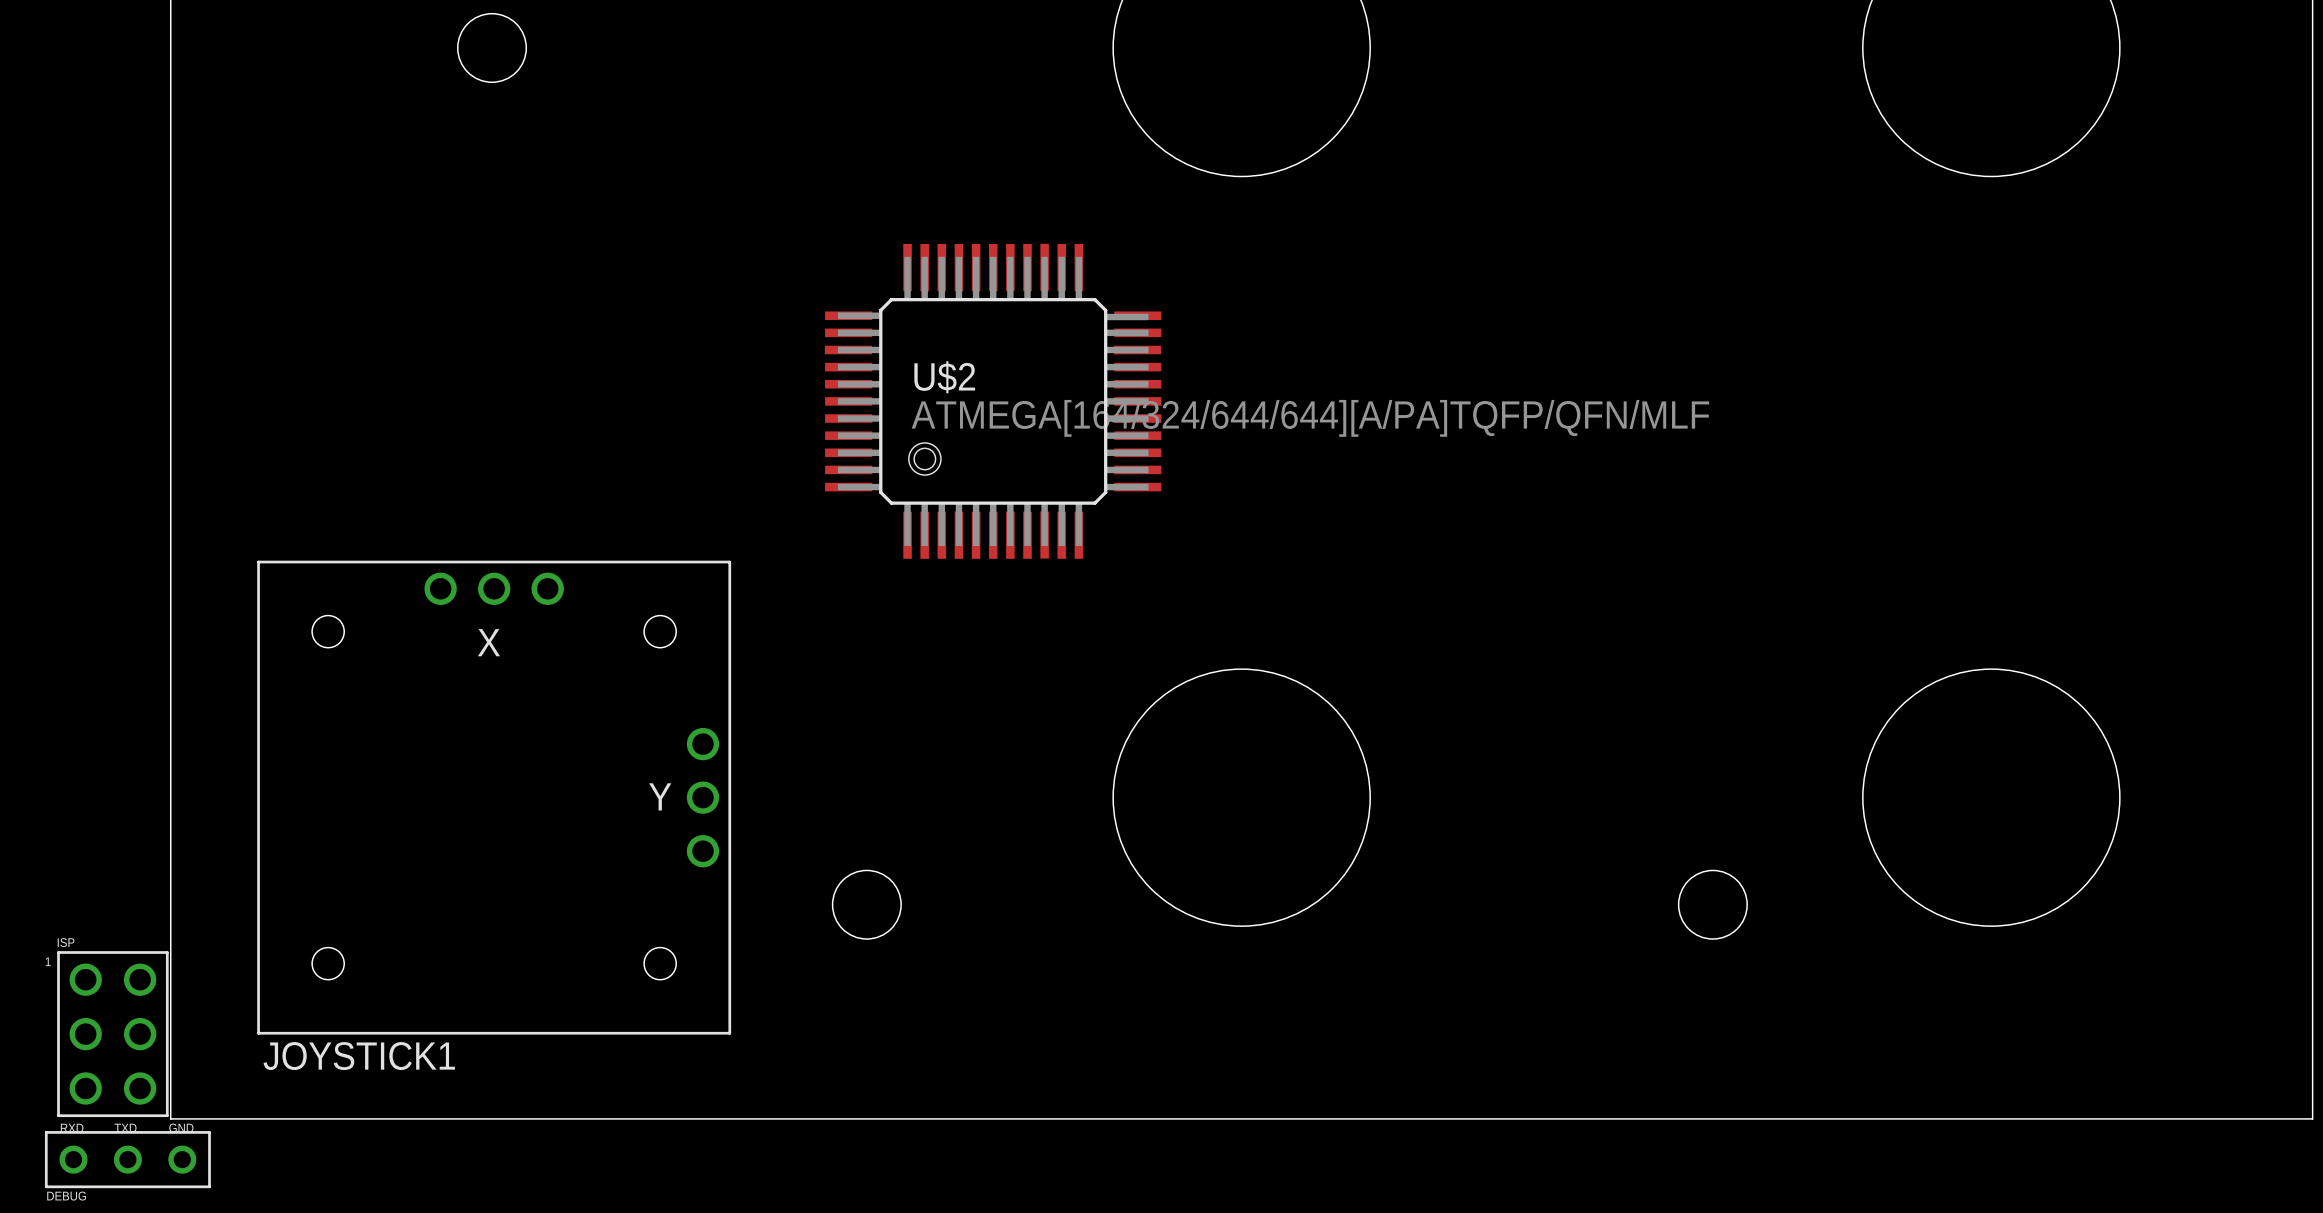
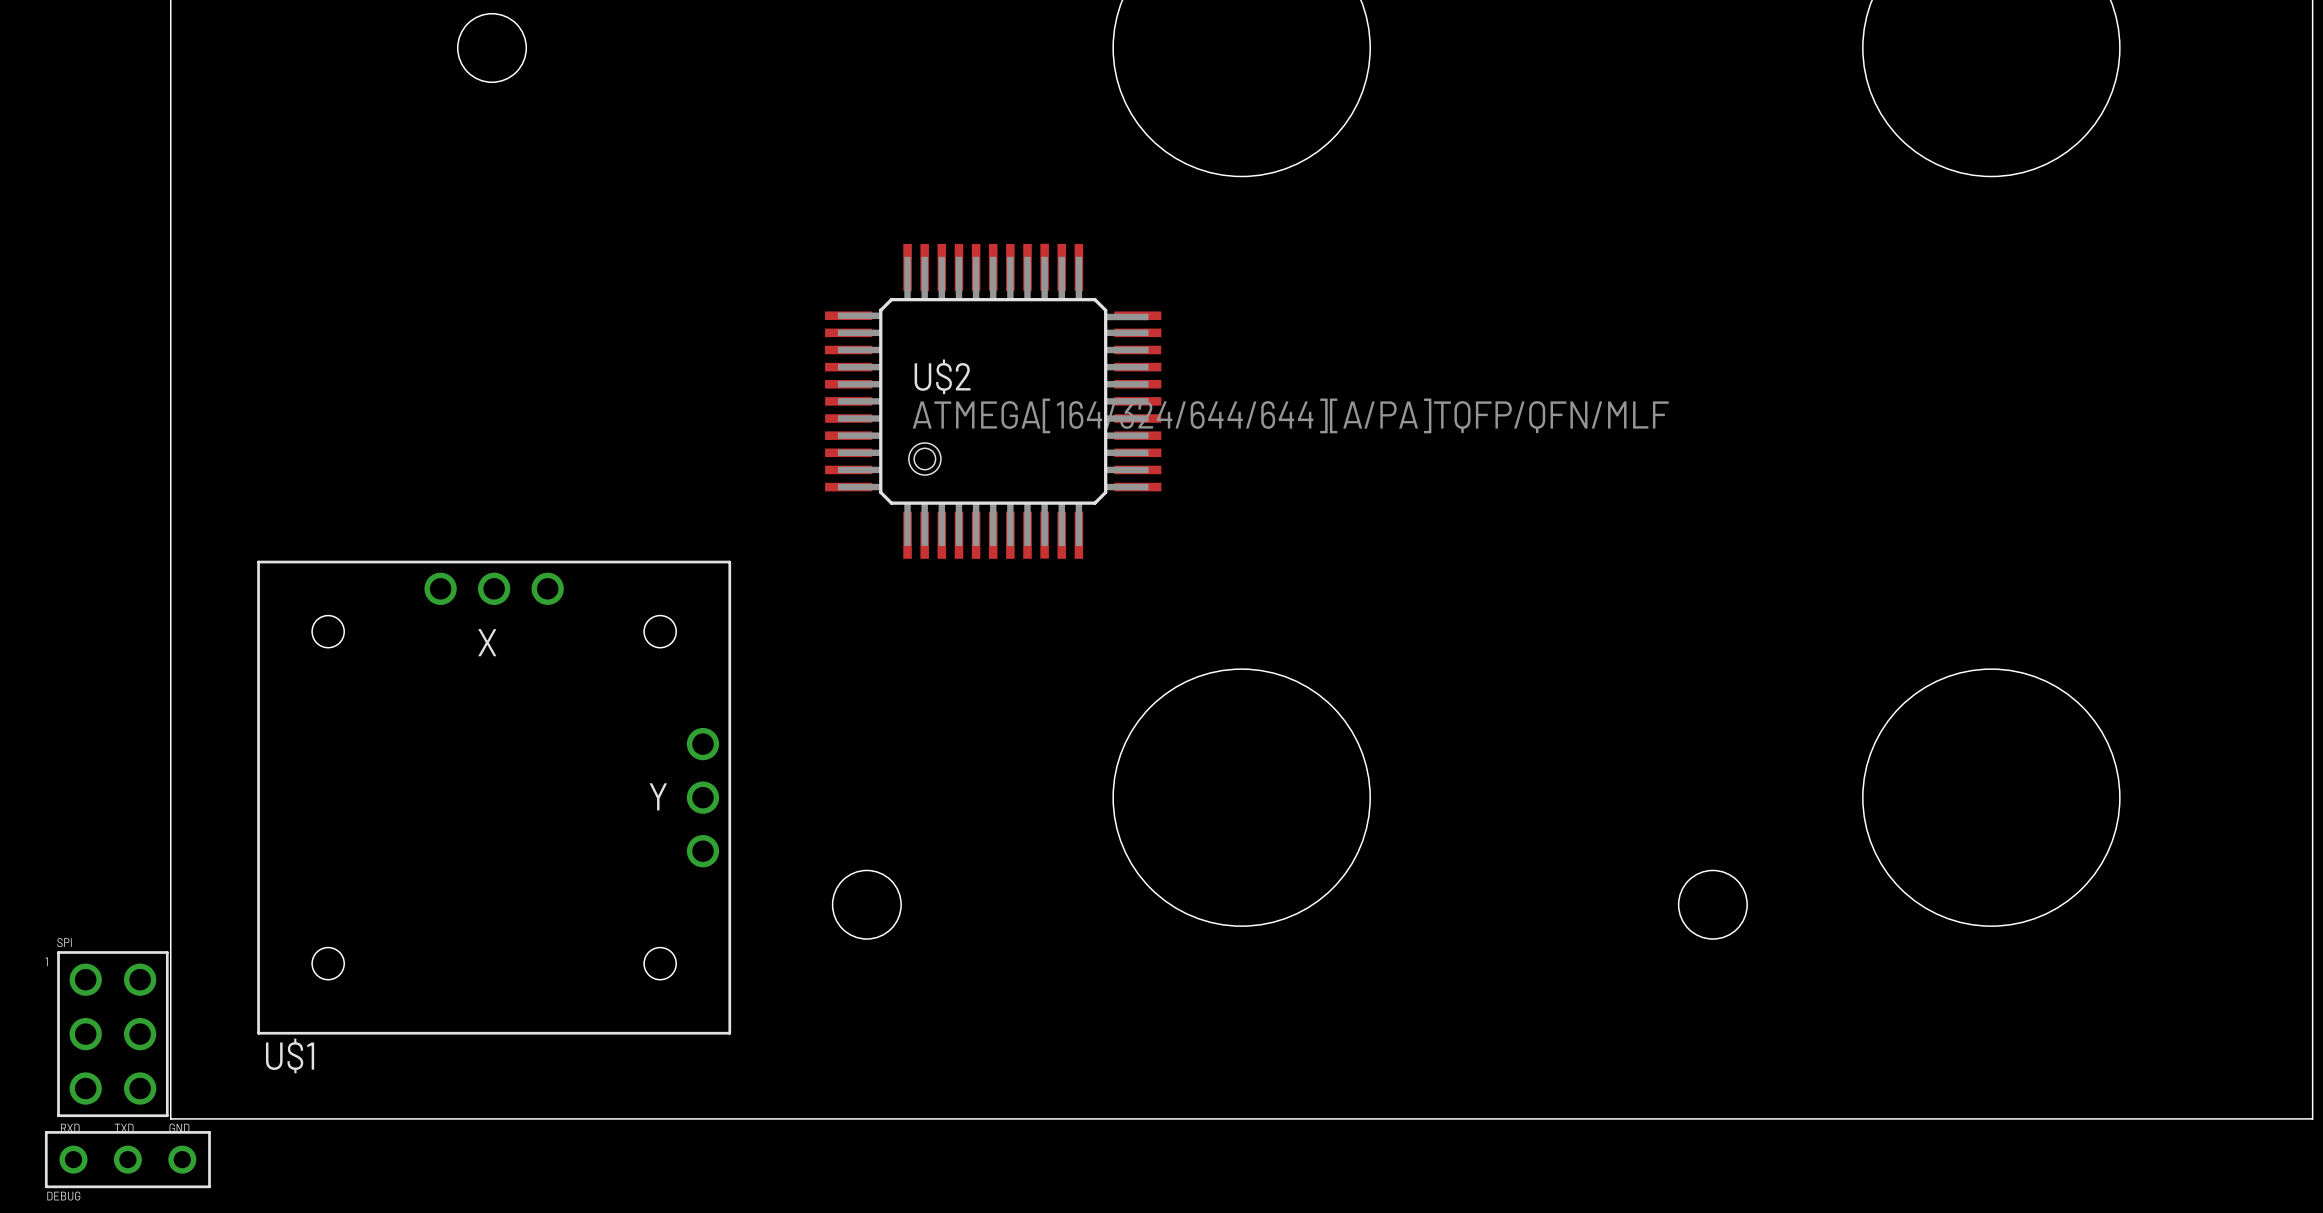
ISP name: ISP (66, 942) -> SPI (64, 942)
JOYSTICK1 name: JOYSTICK1 (359, 1056) -> U$1 (290, 1055)

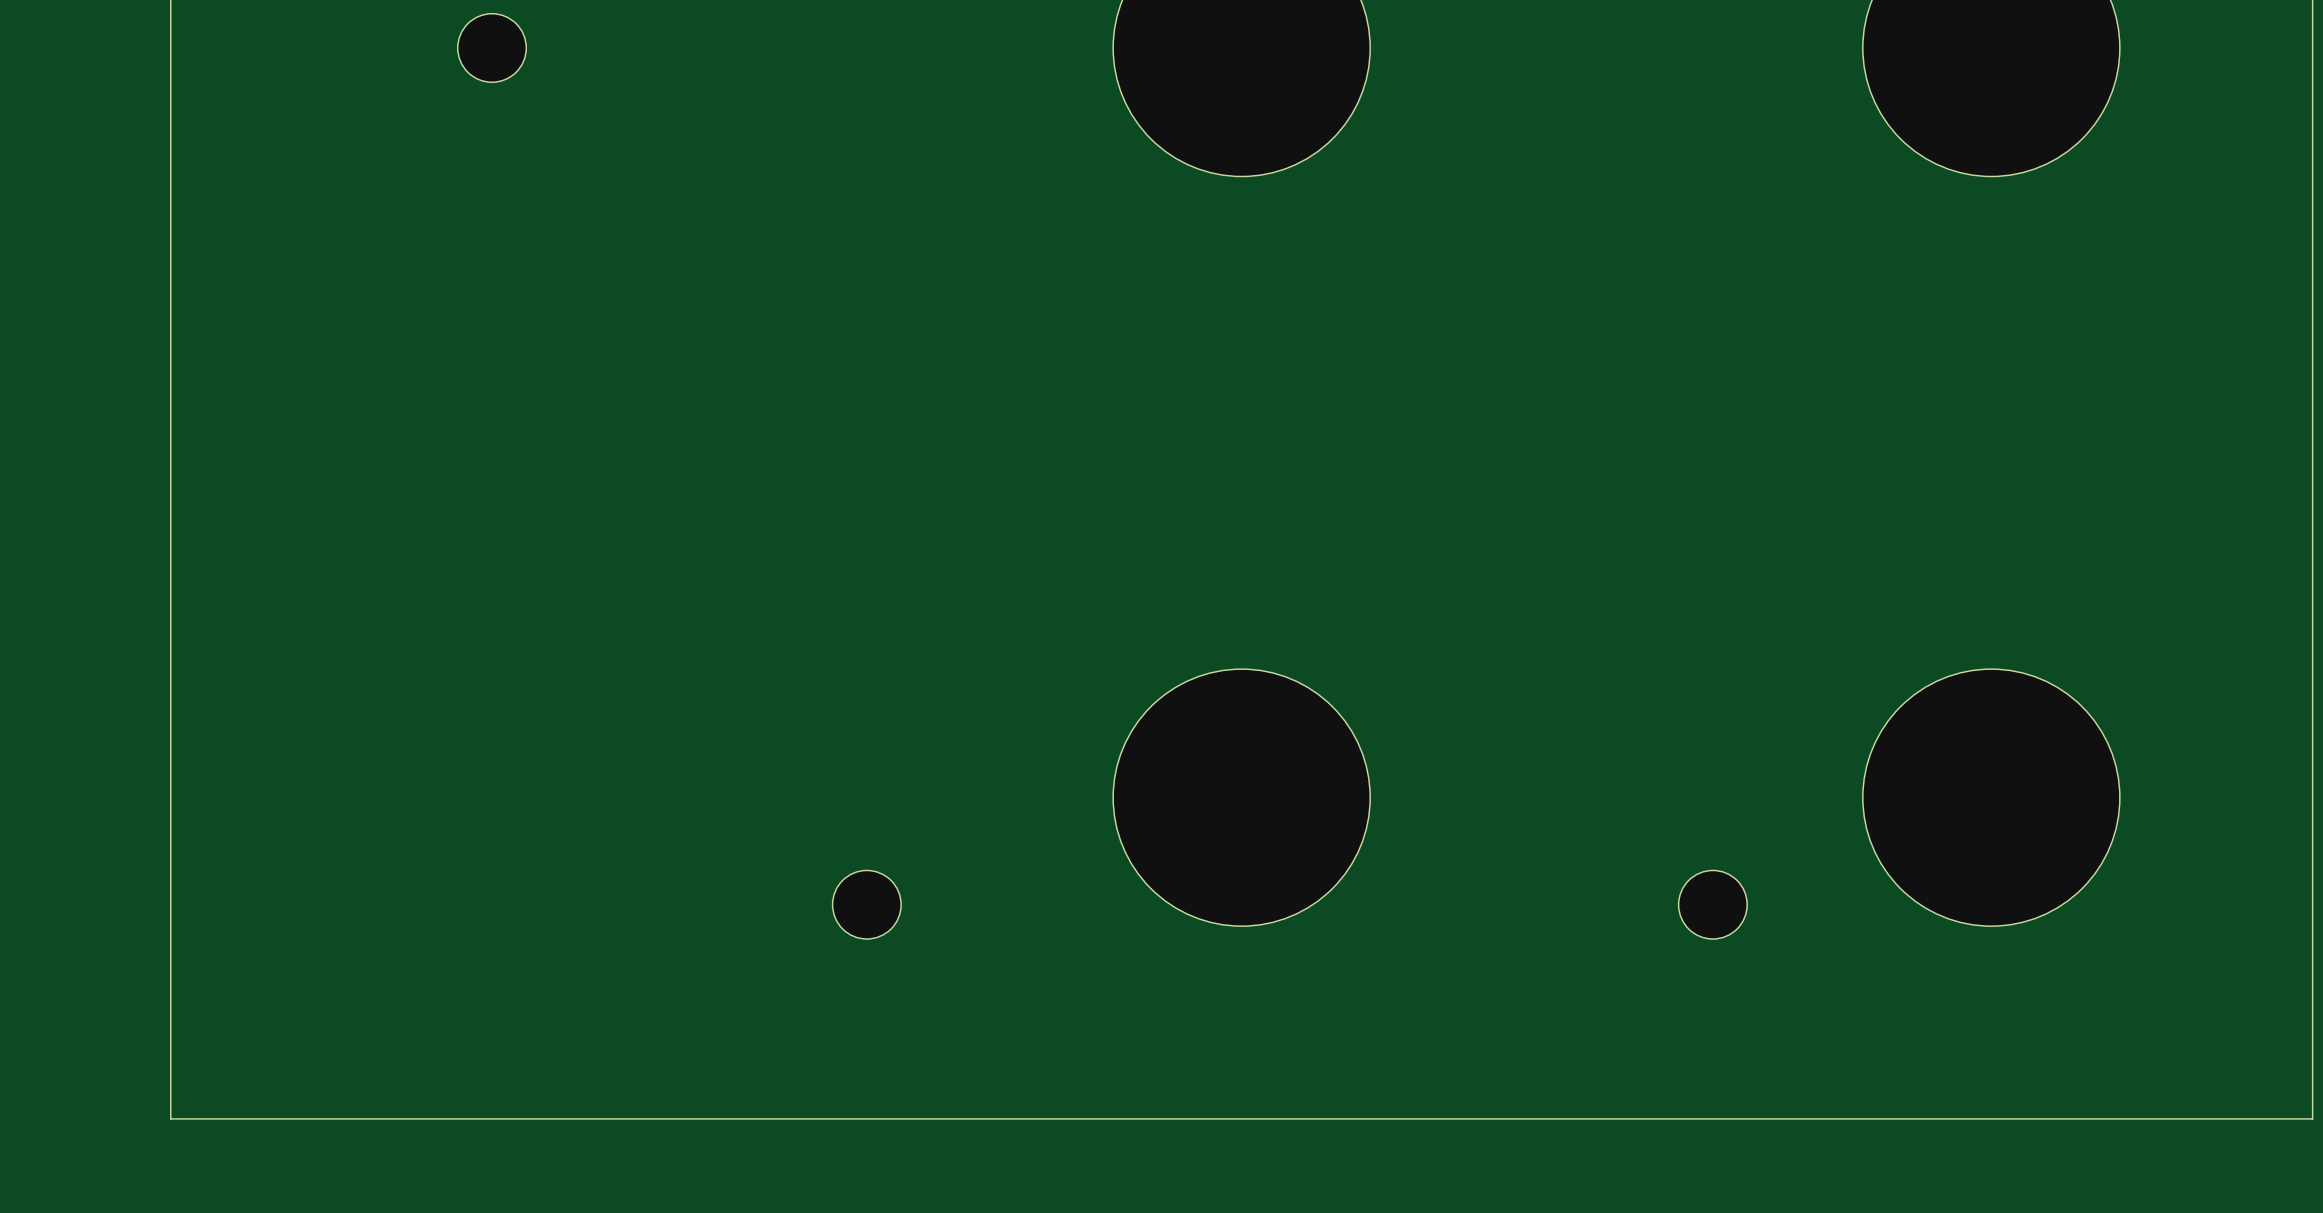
U$2: ATMEGA[164/324/644/644][A/PA]TQFP/QFN/MLF (993, 401) -> none
U$1: (494, 797) -> none
SPI: (112, 1034) -> none
DEBUG: (127, 1159) -> none

